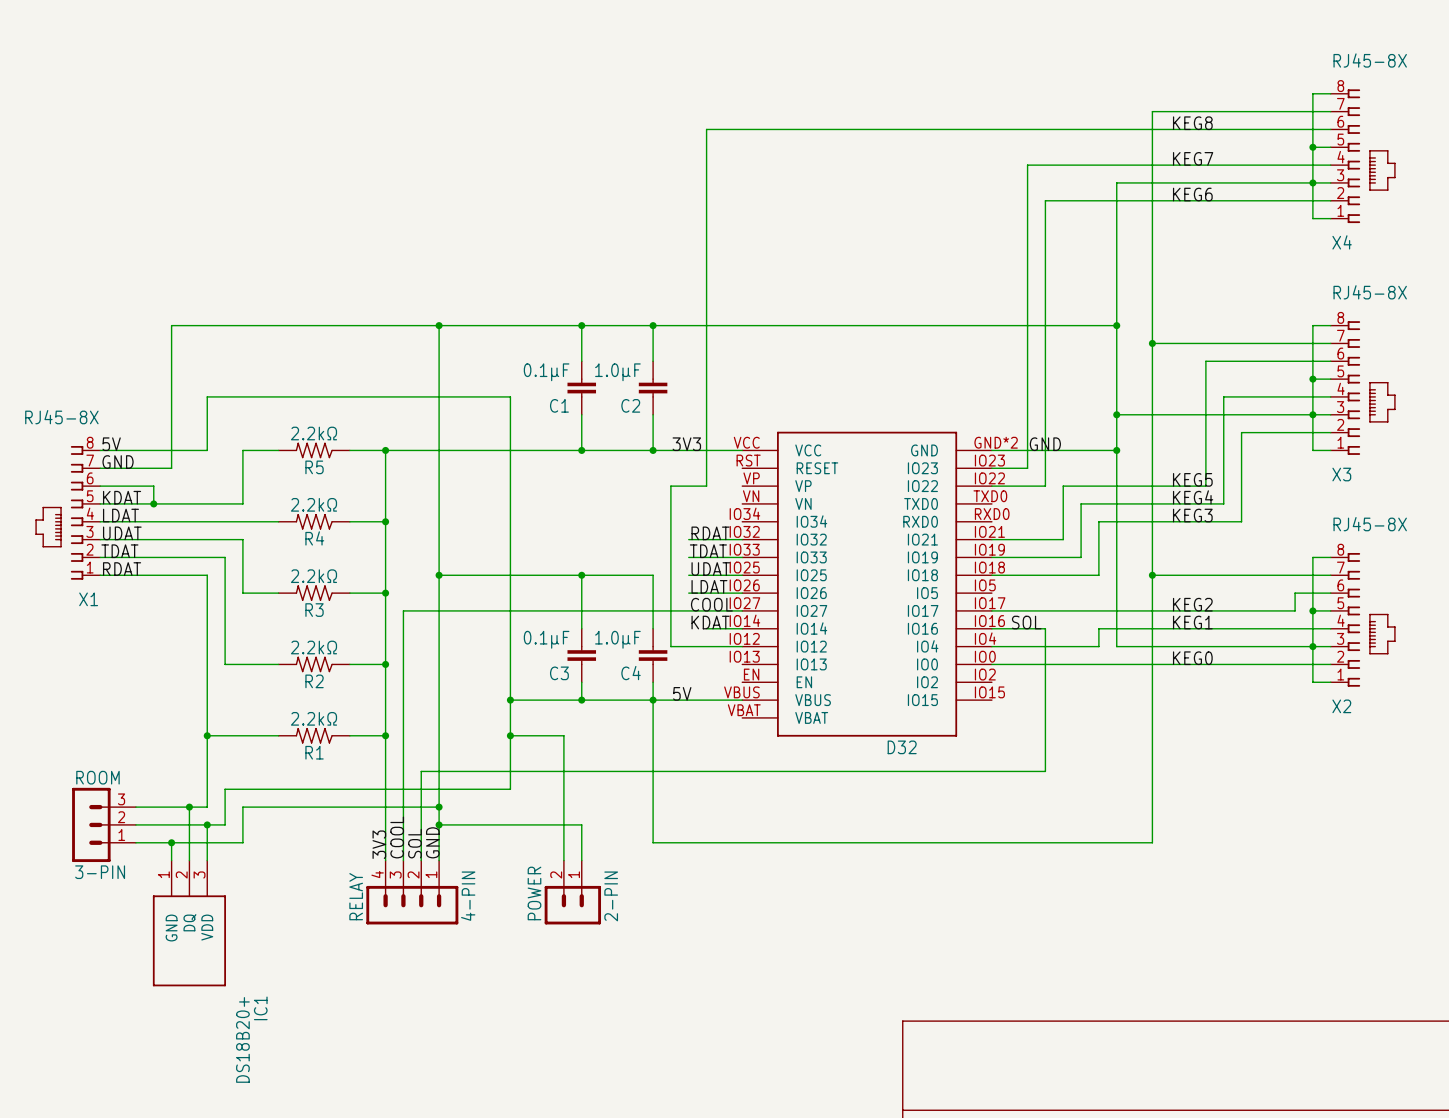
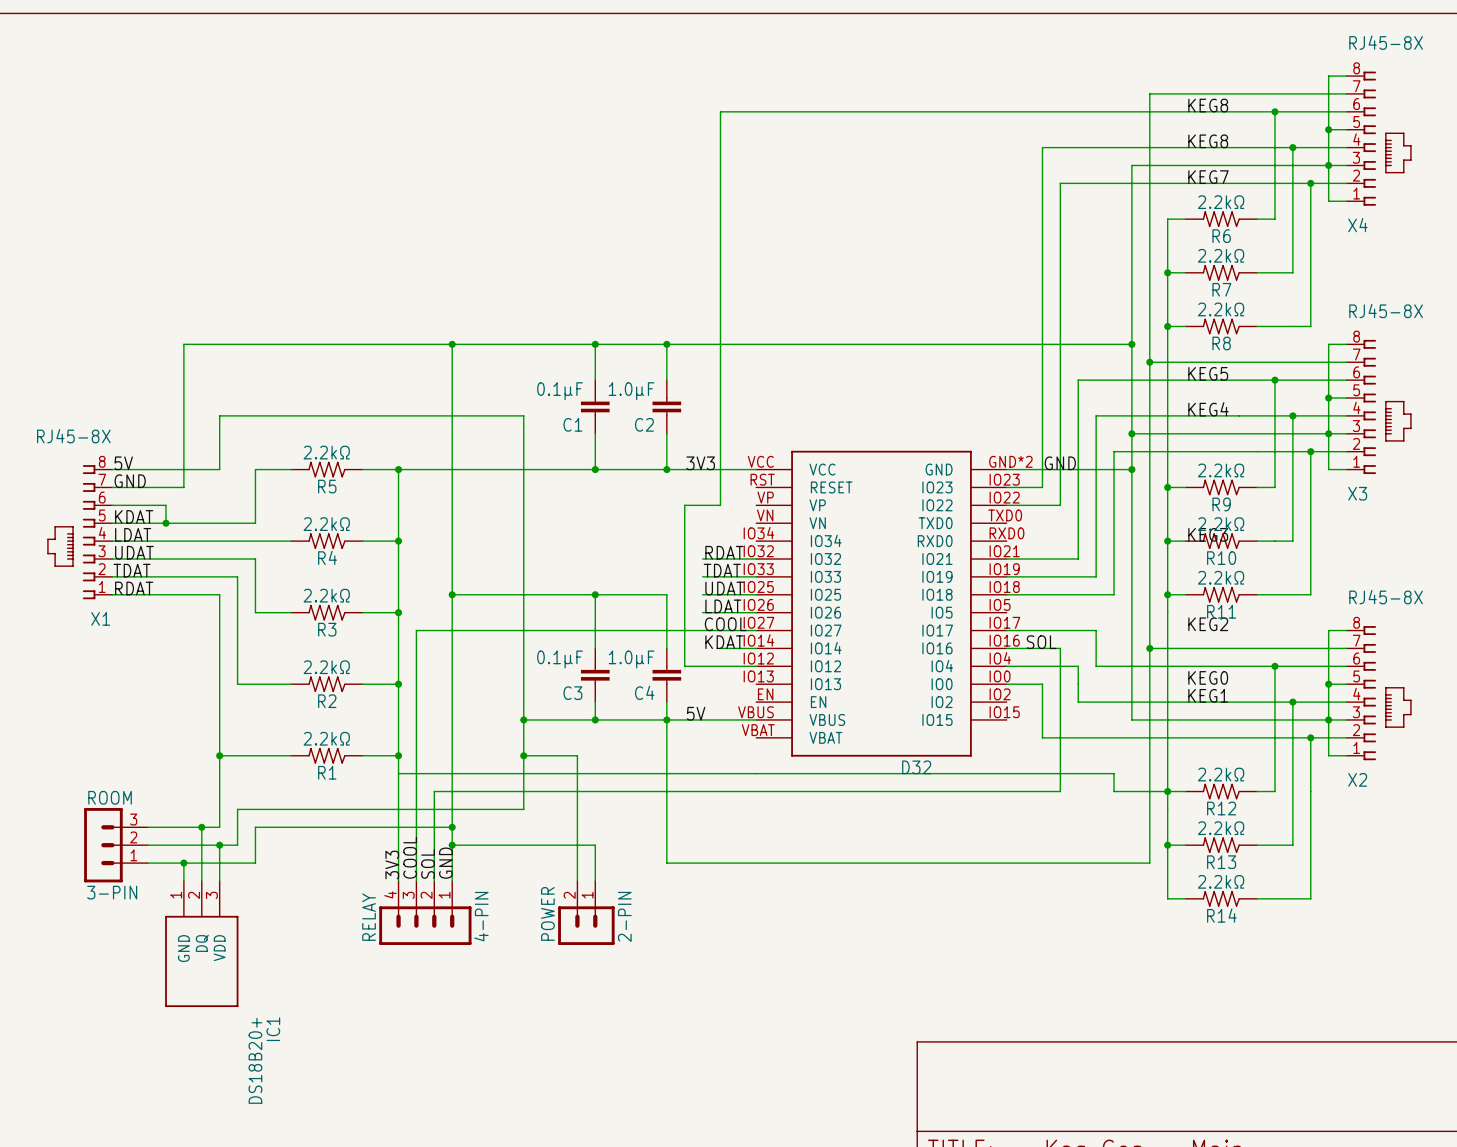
wire: none -> (1346, 93) (1149, 93) (1149, 863)
label: none -> KEG8 (1208, 105)
junction: none -> (1274, 111)
wire: (1312, 111) (1152, 111) (1152, 200) (1045, 200) -> (1060, 183) (1060, 219)
junction: none -> (1328, 129)
wire: (706, 129) (1027, 129) -> (720, 147) (720, 111) (1328, 111) (1328, 76) (1346, 76)
wire: none -> (1292, 147) (1292, 272) (1257, 272)
junction: none -> (1292, 147)
X4 position: (1363, 156) -> (1379, 138)
wire: (1027, 165) (1045, 165) -> (1042, 183) (1042, 147)
wire: none -> (1310, 183) (1310, 326) (1257, 326)
wire: (1116, 182) (1312, 182) (1312, 218) (1330, 218) -> (1131, 201) (1131, 165) (1328, 165)
junction position: (1312, 182) -> (1310, 183)
label: KEG6 (1192, 194) -> none
R6: none -> 2.2kΩ (1221, 219)
wire: (1259, 200) (1330, 200) -> (1274, 219) (1274, 111)
wire: none -> (1167, 272) (1185, 272)
junction: none -> (1167, 272)
R7: none -> 2.2kΩ (1221, 272)
wire: none -> (1167, 326) (1185, 326)
junction: none -> (1167, 326)
R8: none -> 2.2kΩ (1221, 326)
wire: none -> (1149, 362) (1167, 362)
junction: none -> (1149, 362)
junction: (1152, 343) -> none
wire: (1205, 361) (1205, 486) (1063, 486) -> (1221, 380) (1078, 380) (1078, 505)
wire: none -> (1274, 380) (1274, 487) (1257, 487)
junction: none -> (1274, 380)
wire: (1223, 396) (1223, 503) (1081, 503) -> (1239, 415) (1096, 415) (1096, 523)
wire: none -> (1292, 415) (1292, 541) (1257, 541)
junction: none -> (1292, 415)
wire: (1241, 432) (1241, 521) (1170, 521) -> (1257, 451) (1114, 451) (1114, 541)
junction: none -> (1310, 451)
wire: none -> (1167, 487) (1185, 487)
junction: none -> (1167, 487)
R9: none -> 2.2kΩ (1221, 487)
label position: KEG5 (1192, 479) -> KEG5 (1208, 373)
label position: KEG4 (1193, 497) -> KEG4 (1208, 409)
wire: (1098, 521) (1152, 521) -> none
junction: none -> (1167, 541)
R10: none -> 2.2kΩ (1221, 541)
wire: (1330, 557) (1312, 557) (1312, 610) -> none
R11: none -> 2.2kΩ (1221, 594)
wire: (1295, 575) (1330, 575) -> (1310, 594) (1310, 451)
wire: (1330, 593) (1295, 593) (1295, 610) (1081, 610) -> none
junction: (1312, 610) -> none
X2 position: (1363, 619) -> (1379, 693)
label position: KEG1 (1192, 622) -> KEG1 (1208, 695)
wire: (1134, 628) (1098, 628) (1098, 646) -> (1346, 719) (1131, 719) (1131, 666) (1114, 666)
junction: none -> (1149, 648)
wire: (1063, 646) (1081, 646) -> (1096, 630) (1096, 666)
wire: none -> (1078, 666) (1078, 702) (1328, 702) (1328, 755) (1346, 755)
wire: none -> (1274, 666) (1274, 791) (1257, 791)
junction: none -> (1274, 666)
junction position: (1312, 646) -> (1328, 684)
wire: (1027, 664) (1312, 664) -> (1042, 684) (1042, 737) (1346, 737)
wire: none -> (1292, 702) (1292, 845) (1257, 845)
junction: none -> (1292, 702)
junction: none -> (1328, 719)
wire: none -> (1310, 737) (1310, 898) (1257, 898)
junction: none -> (1310, 737)
wire: none -> (398, 773) (1114, 773) (1114, 791) (1185, 791)
junction: none -> (1167, 791)
R12: none -> 2.2kΩ (1221, 791)
wire: none -> (1167, 845) (1185, 845)
junction: none -> (1167, 845)
R13: none -> 2.2kΩ (1221, 845)
wire: (1134, 842) (1152, 842) -> (1185, 898) (1167, 898) (1167, 863)
R14: none -> 2.2kΩ (1221, 898)

